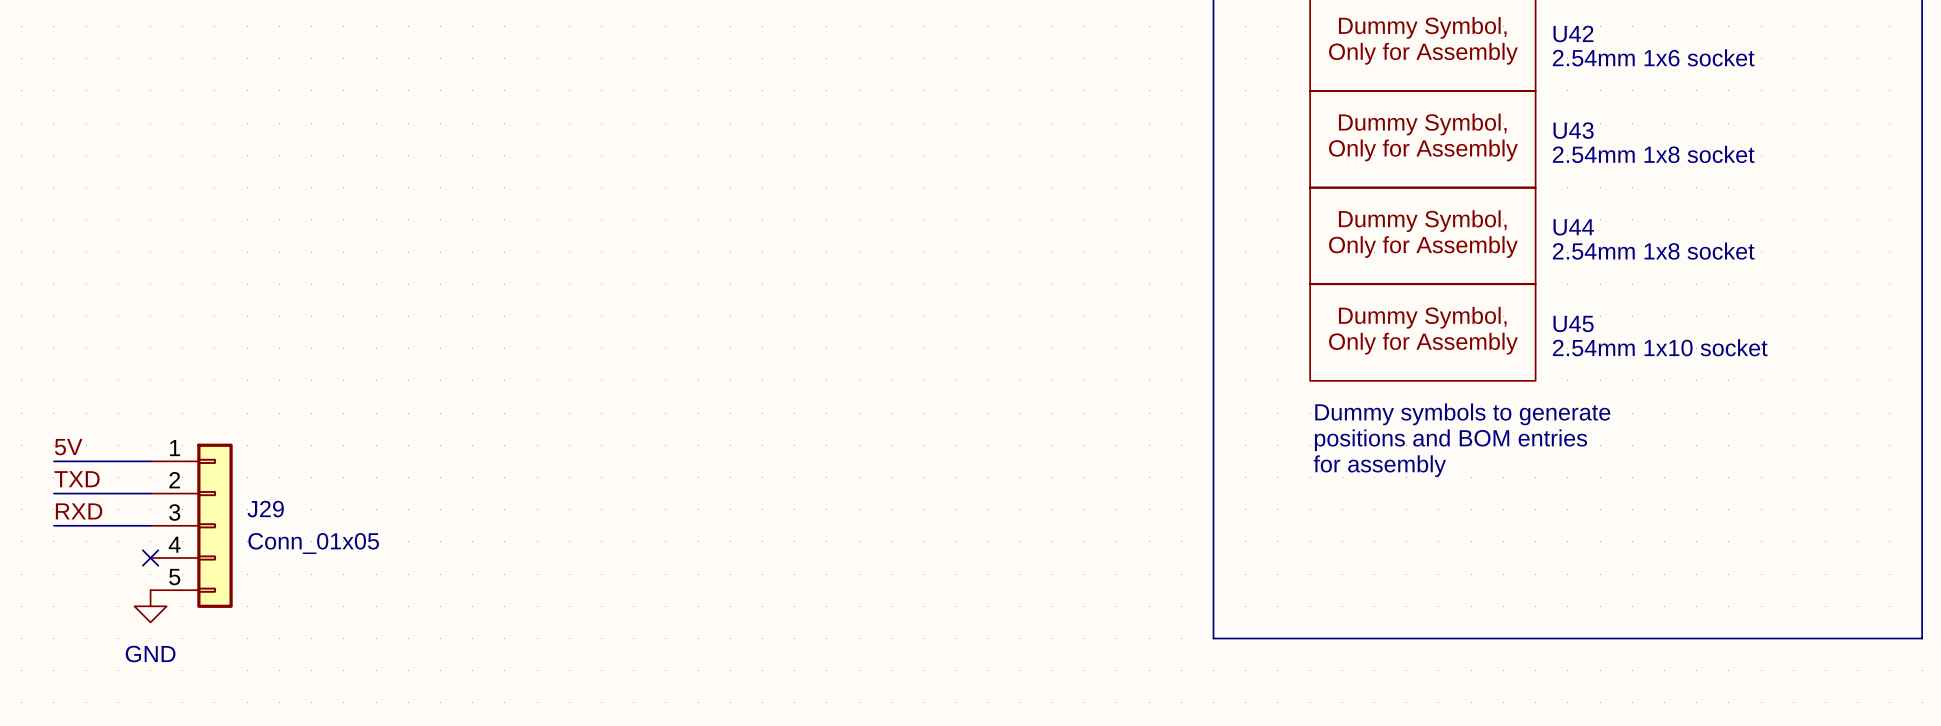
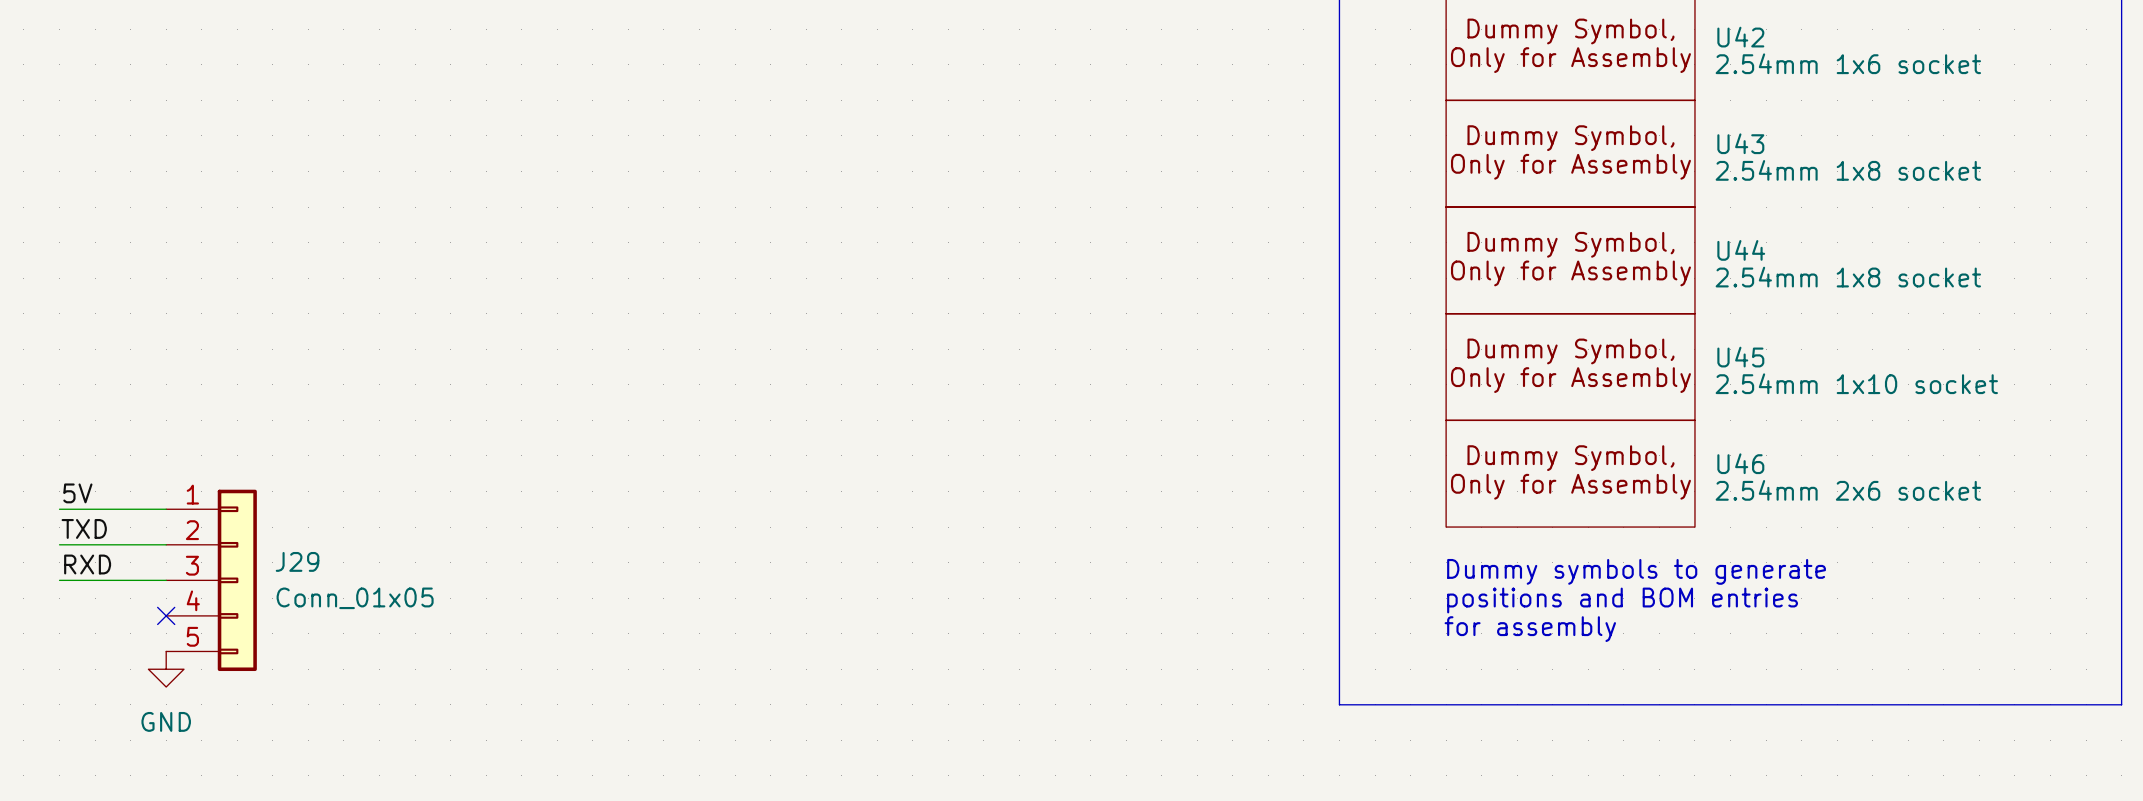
text position: Dummy symbols to generate (1462, 414) -> Dummy symbols to generate (1636, 571)
U46: none -> 2.54mm 2x6 socket (1570, 473)
text position: positions and BOM entries (1450, 440) -> positions and BOM entries (1622, 600)
text position: for assembly (1379, 466) -> for assembly (1530, 629)

